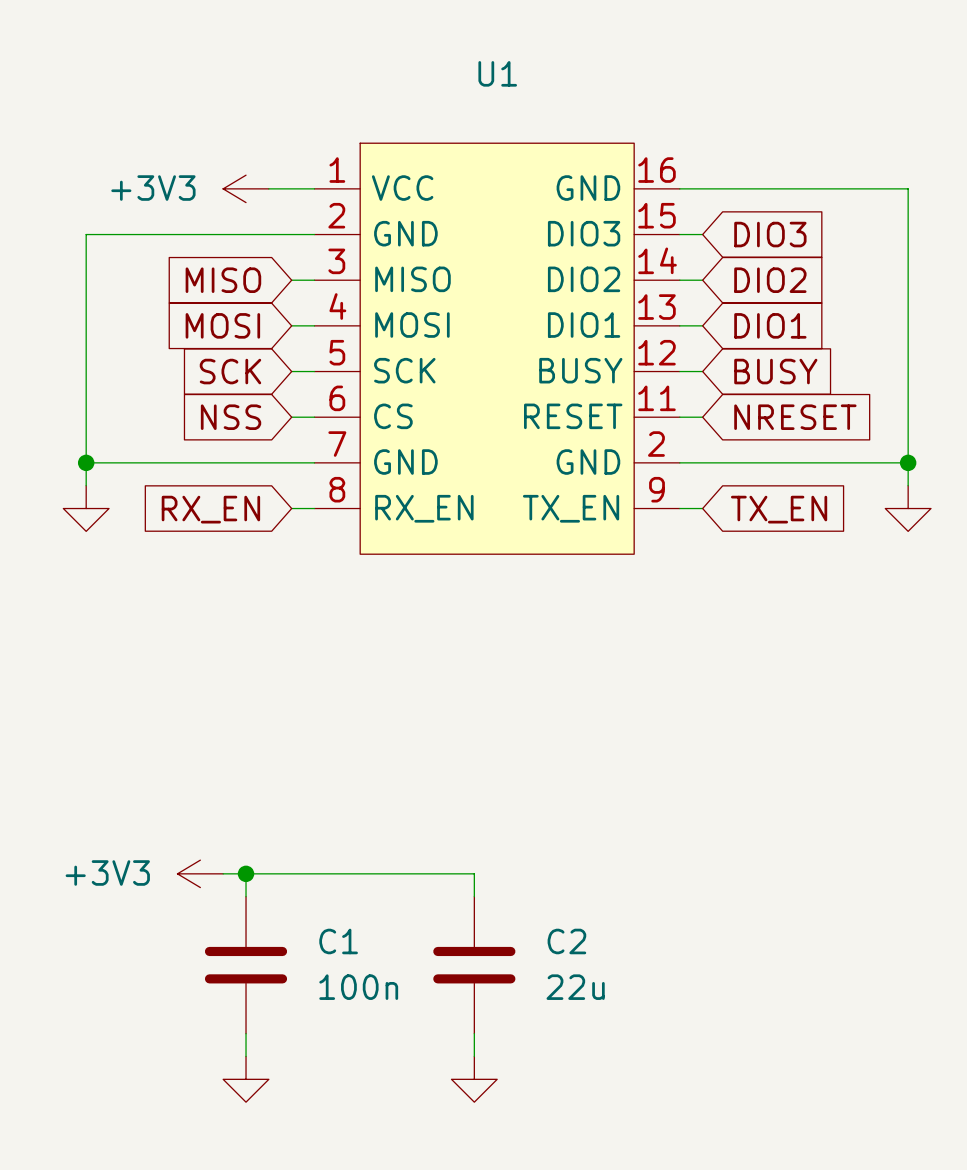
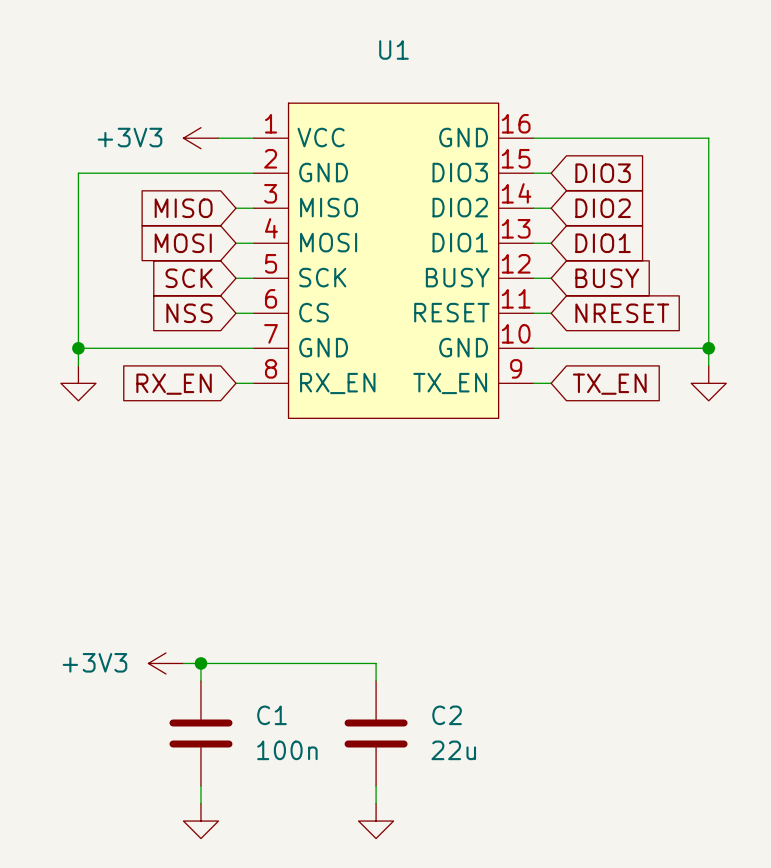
U1 pin number: 2 (656, 444) -> 10 (516, 333)

